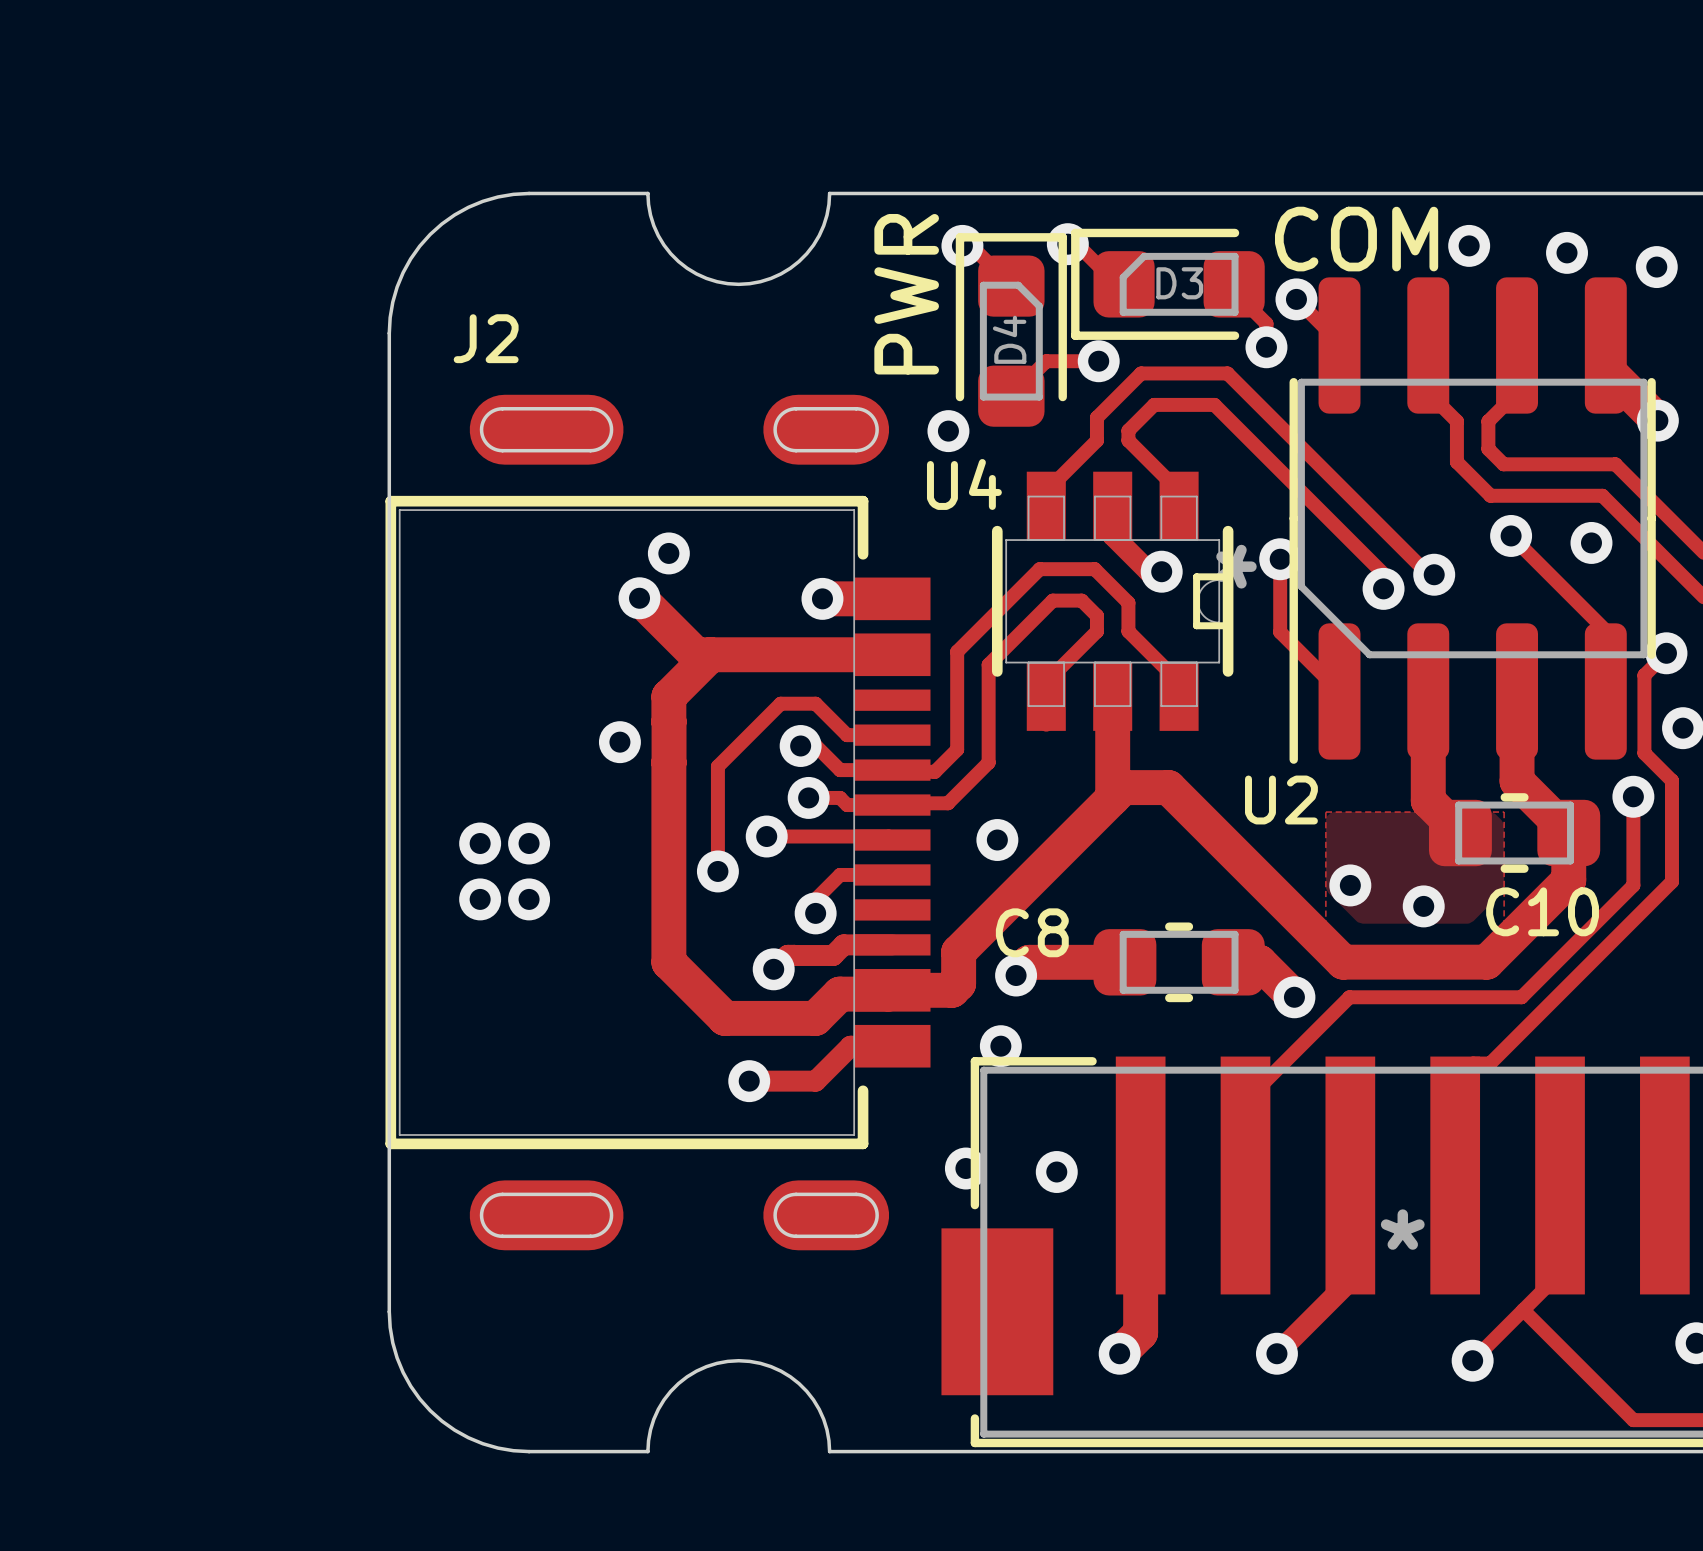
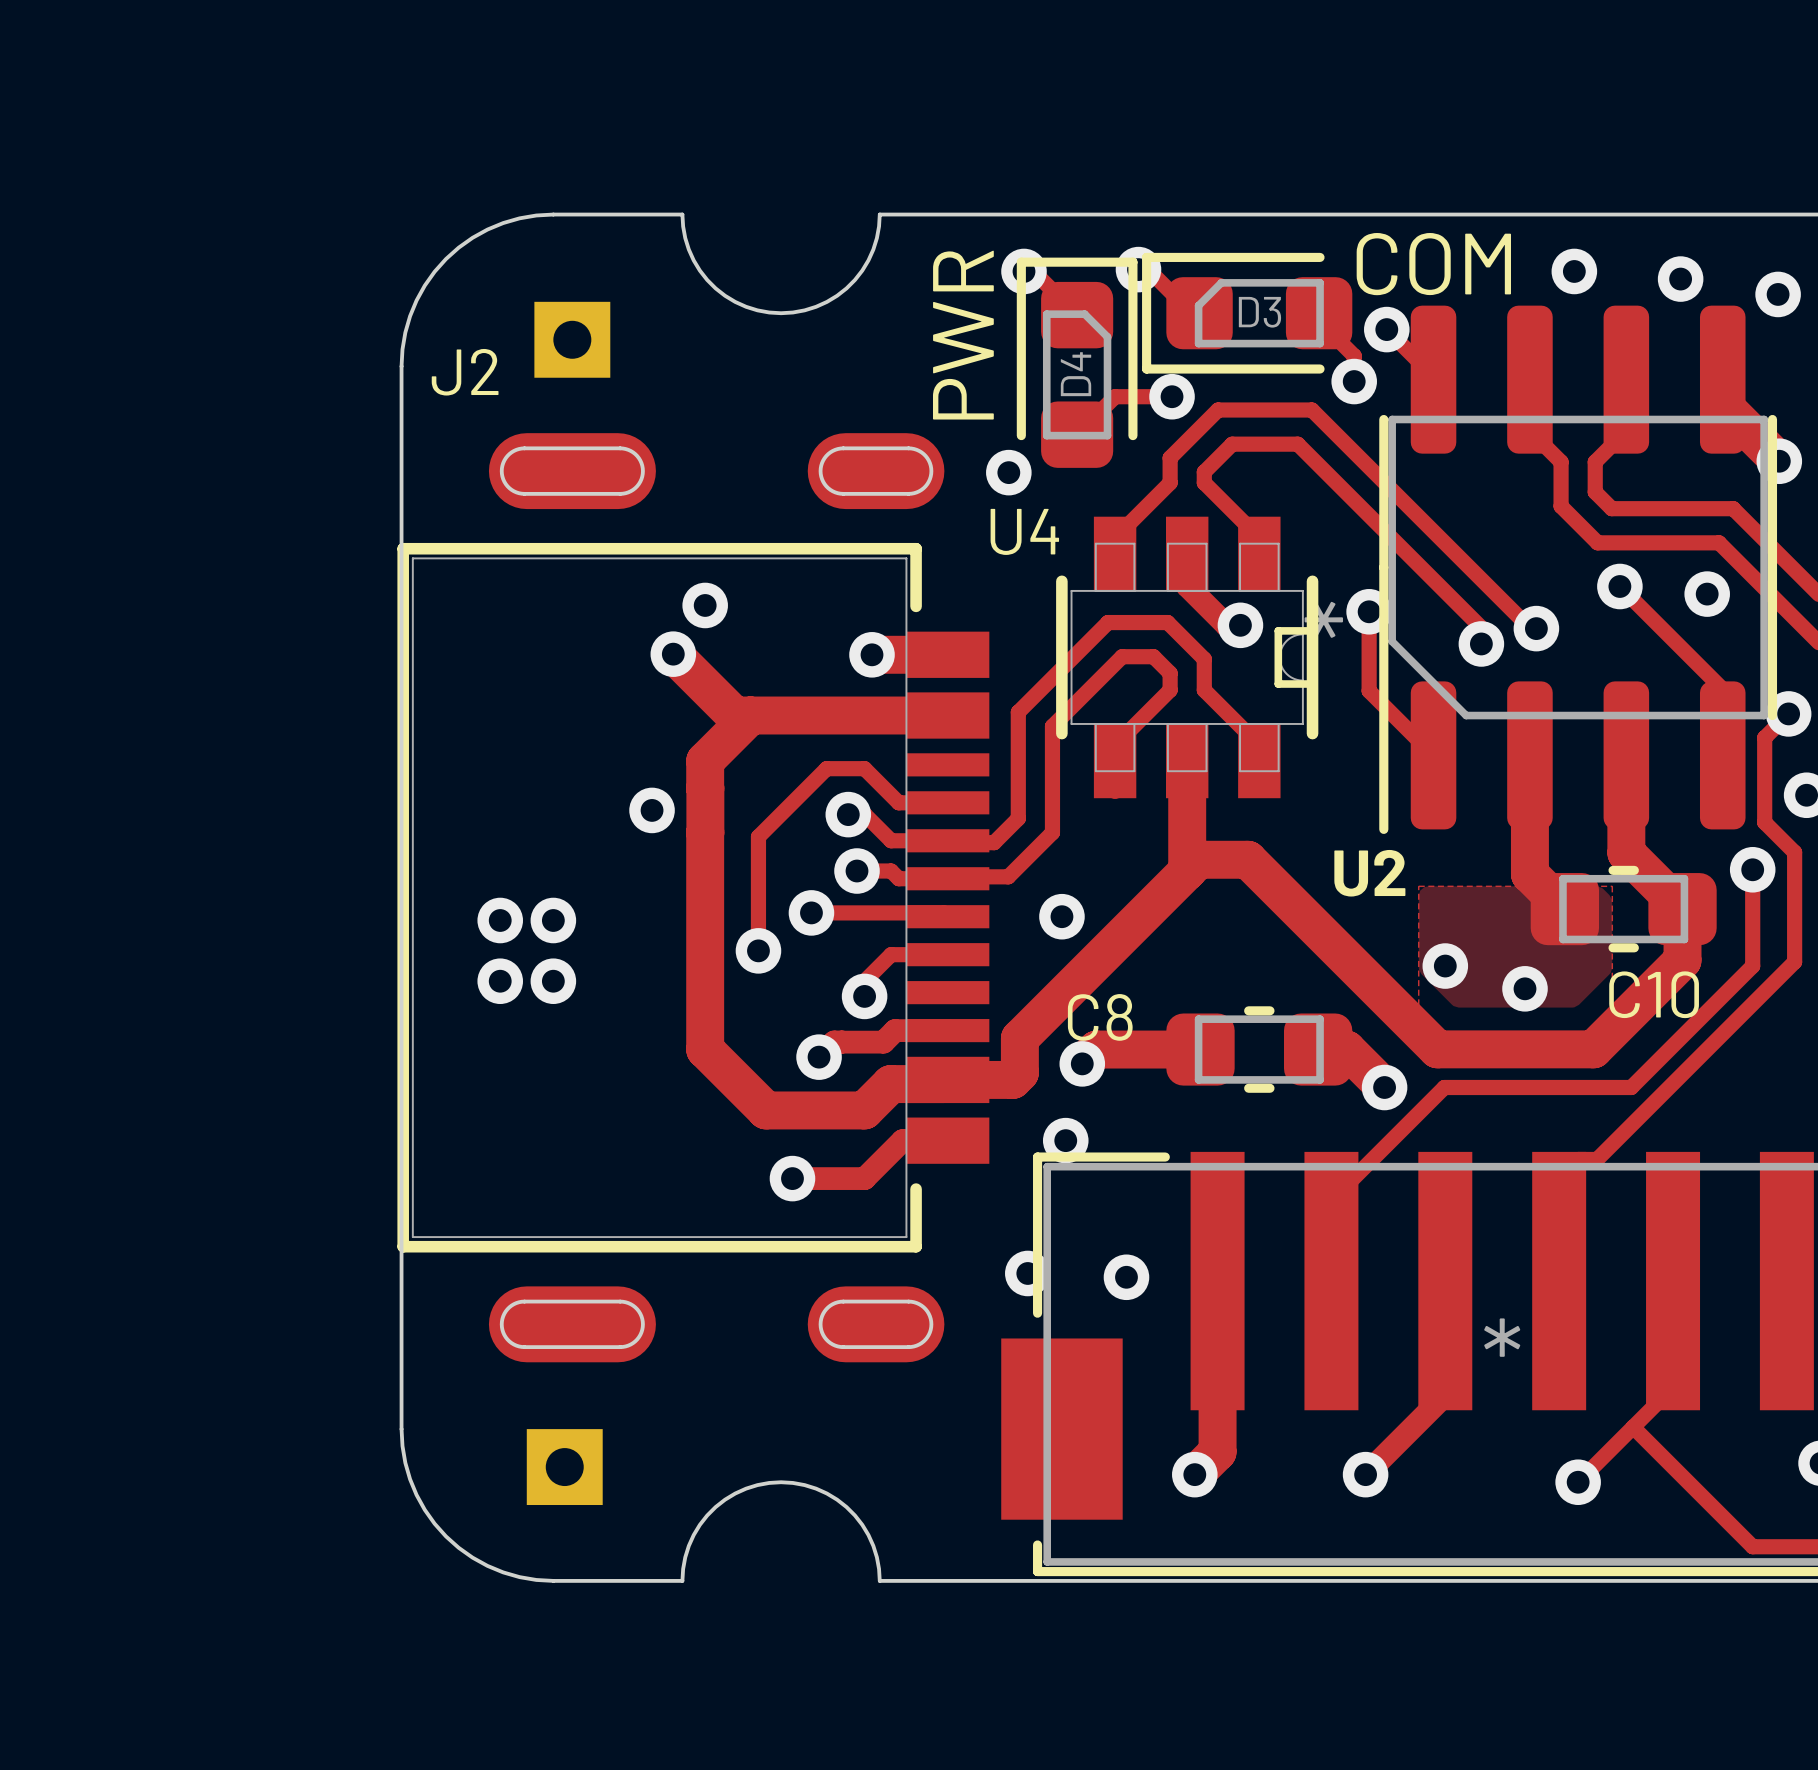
part: none -> (572, 339)
J2 name position: J2 (486, 338) -> J2 (465, 372)
part: none -> (564, 1467)

